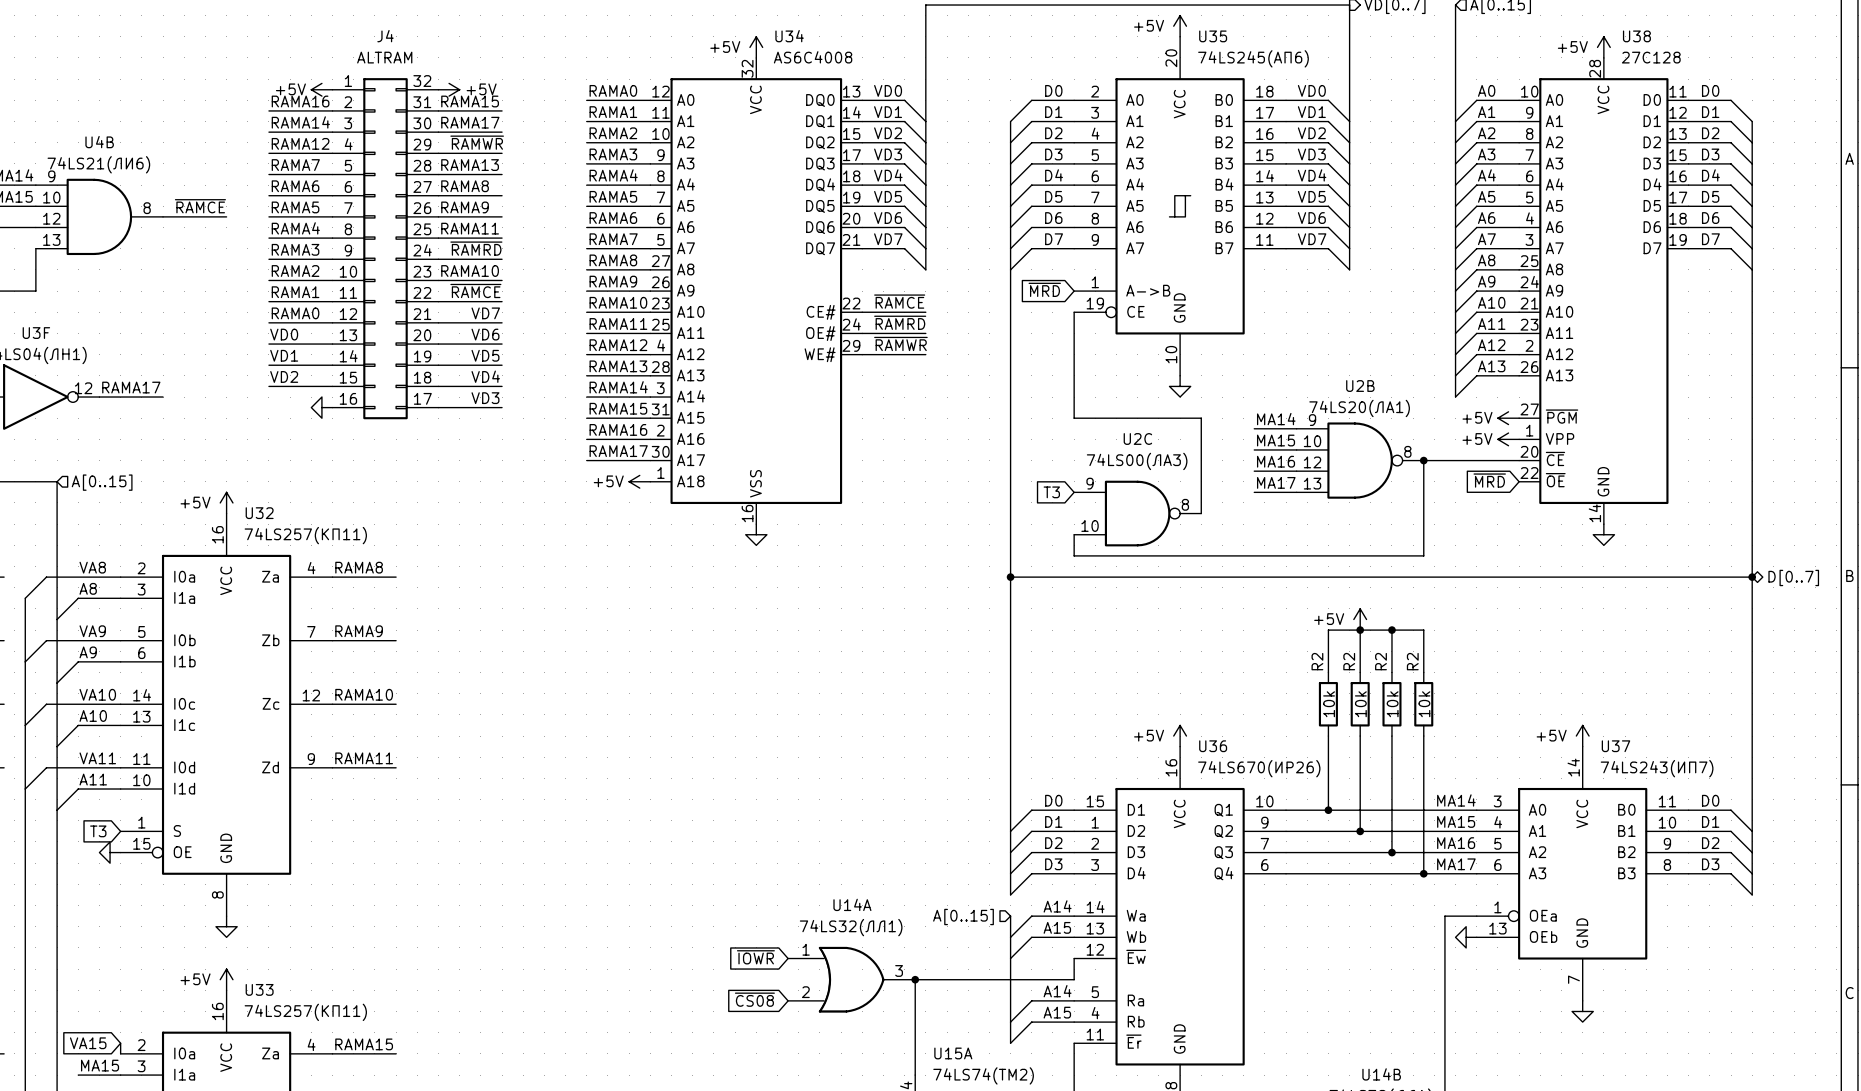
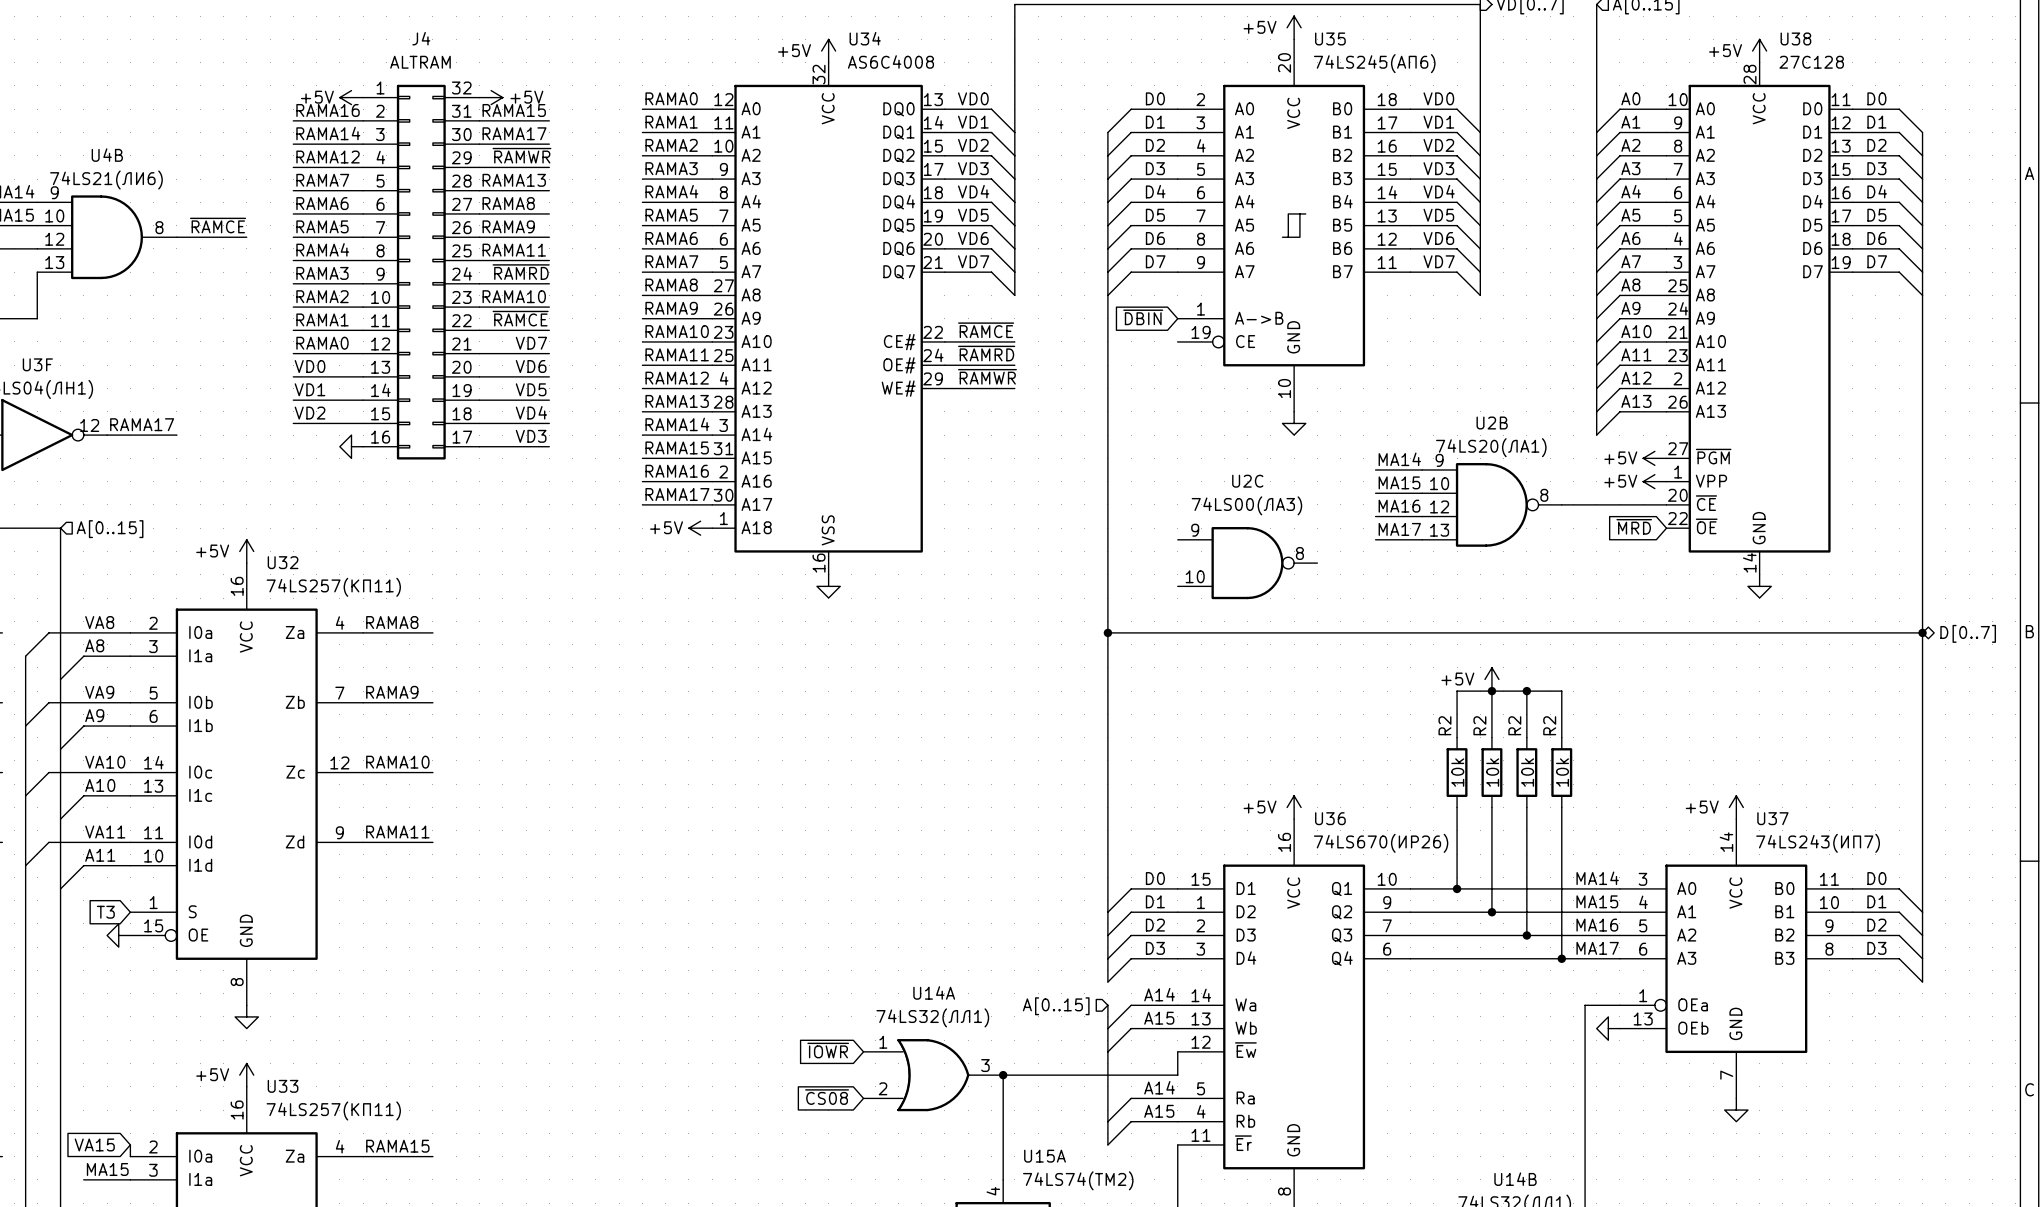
global label: ~{MRD} (1044, 289) -> ~{DBIN} (1143, 317)
wire: (1074, 312) (1074, 418) (1201, 418) (1201, 513) -> none
wire: (1423, 460) (1423, 555) (1074, 555) (1074, 534) -> none
junction: (1423, 460) -> none
global label: T3 (1051, 492) -> none

